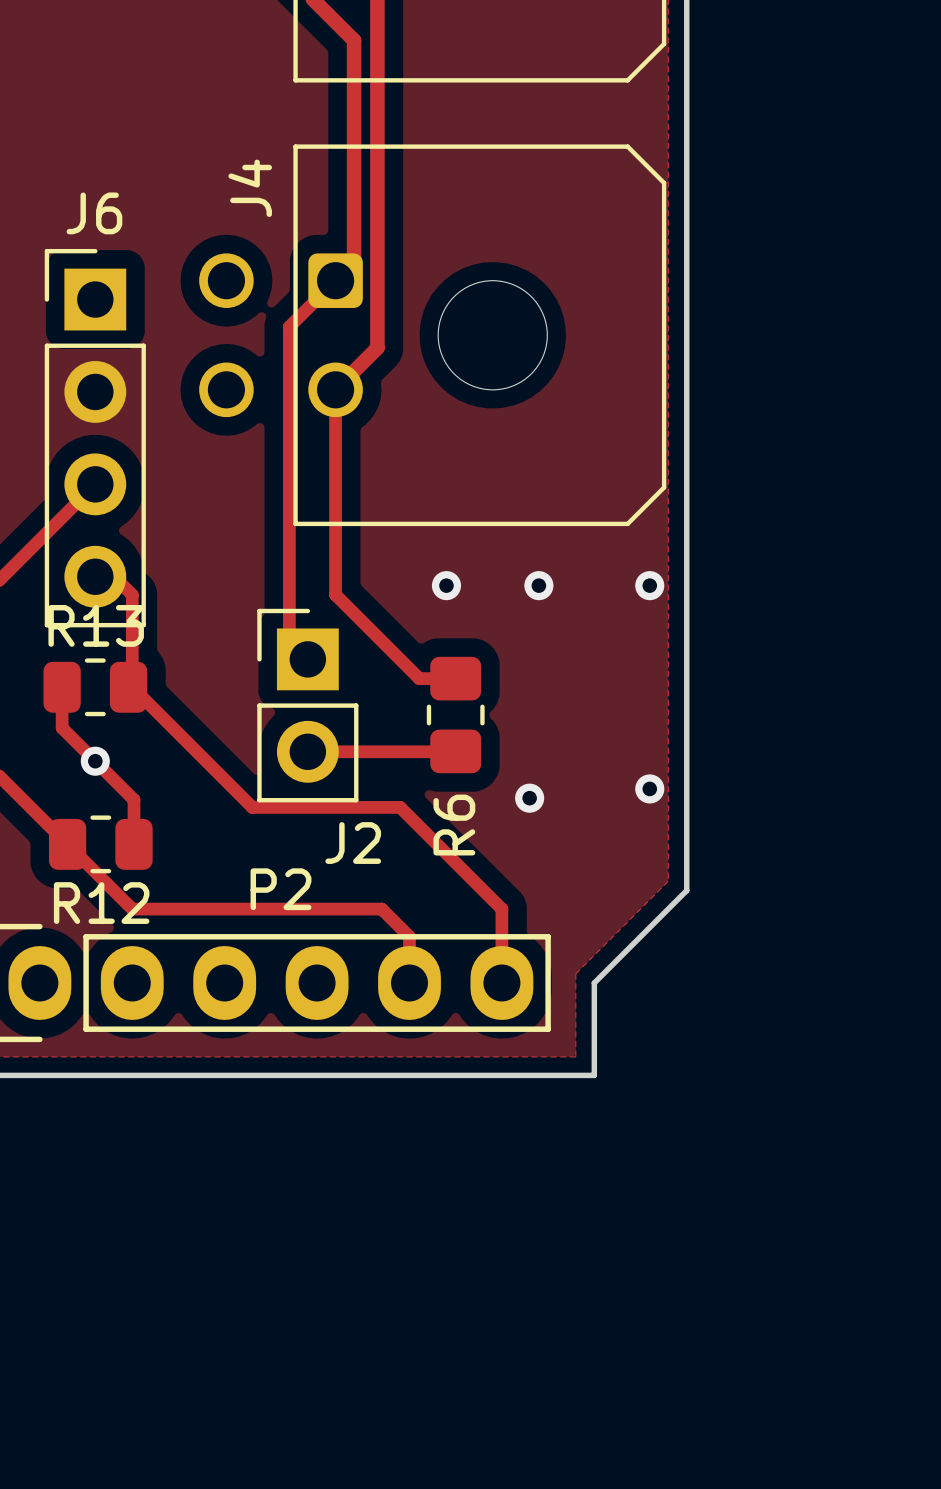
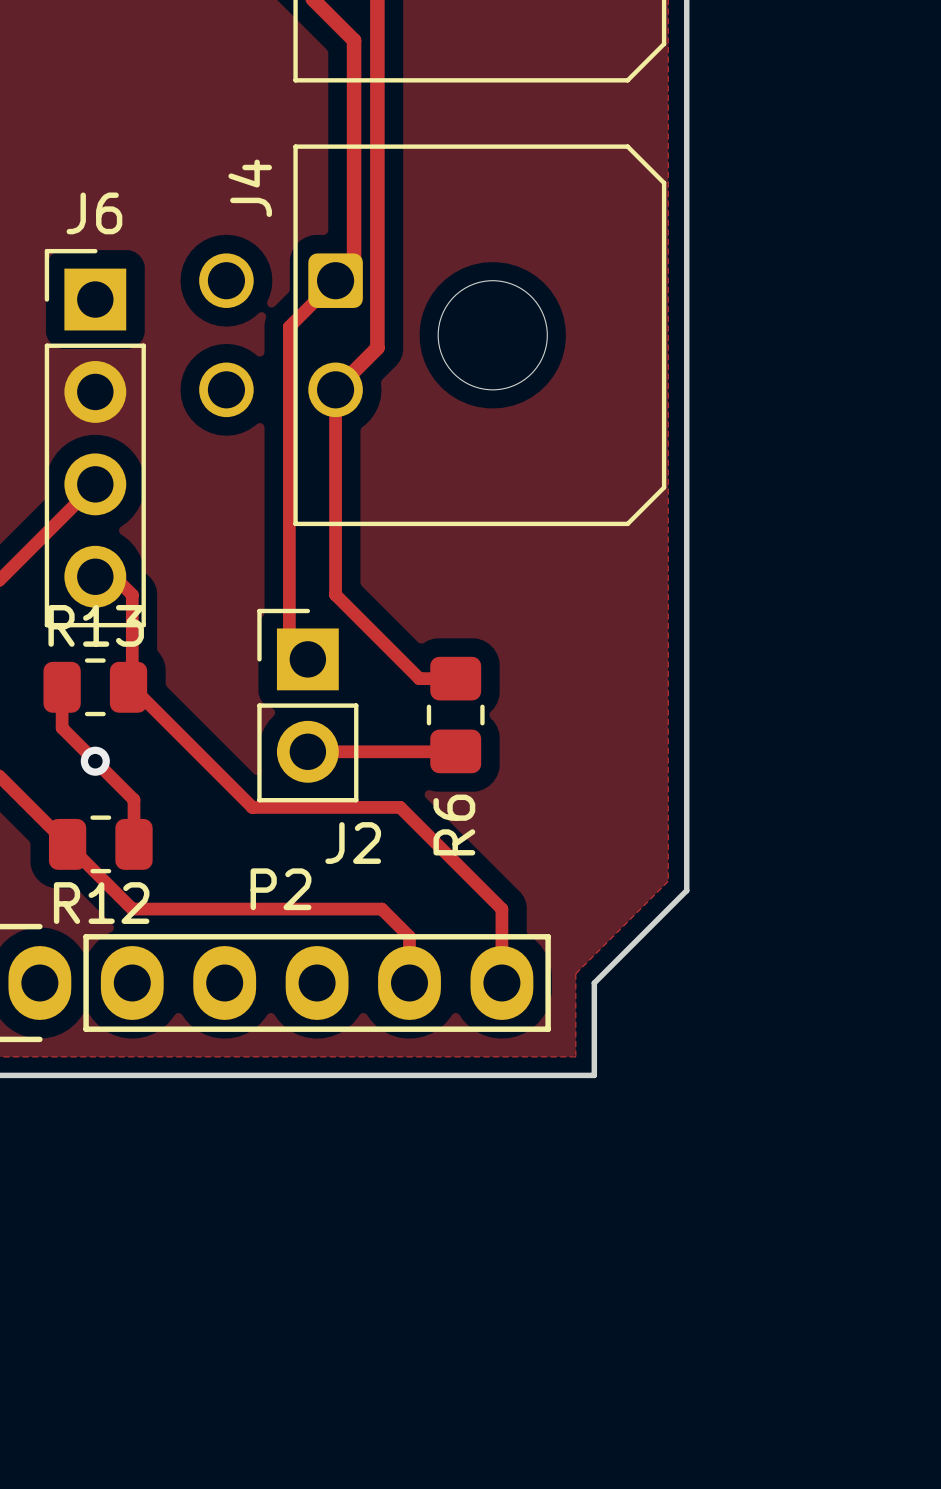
via: (446, 585) -> none
via: (538, 585) -> none
via: (649, 585) -> none
via: (649, 788) -> none
via: (529, 798) -> none

